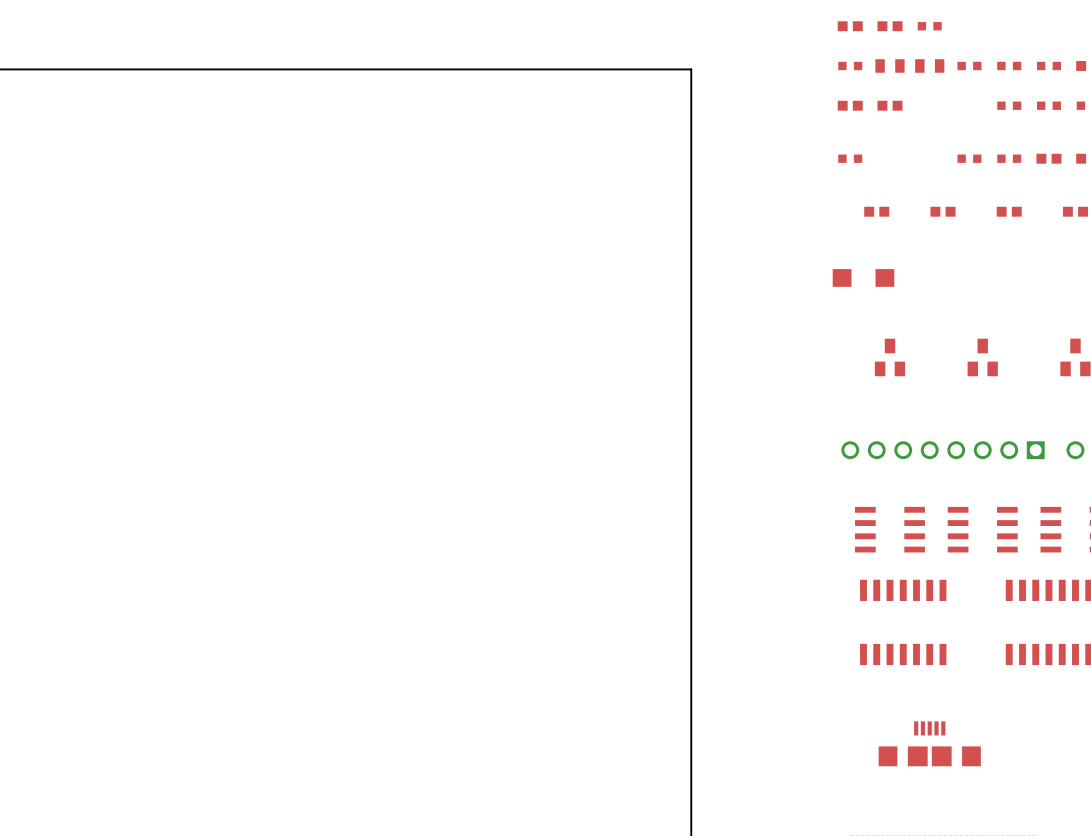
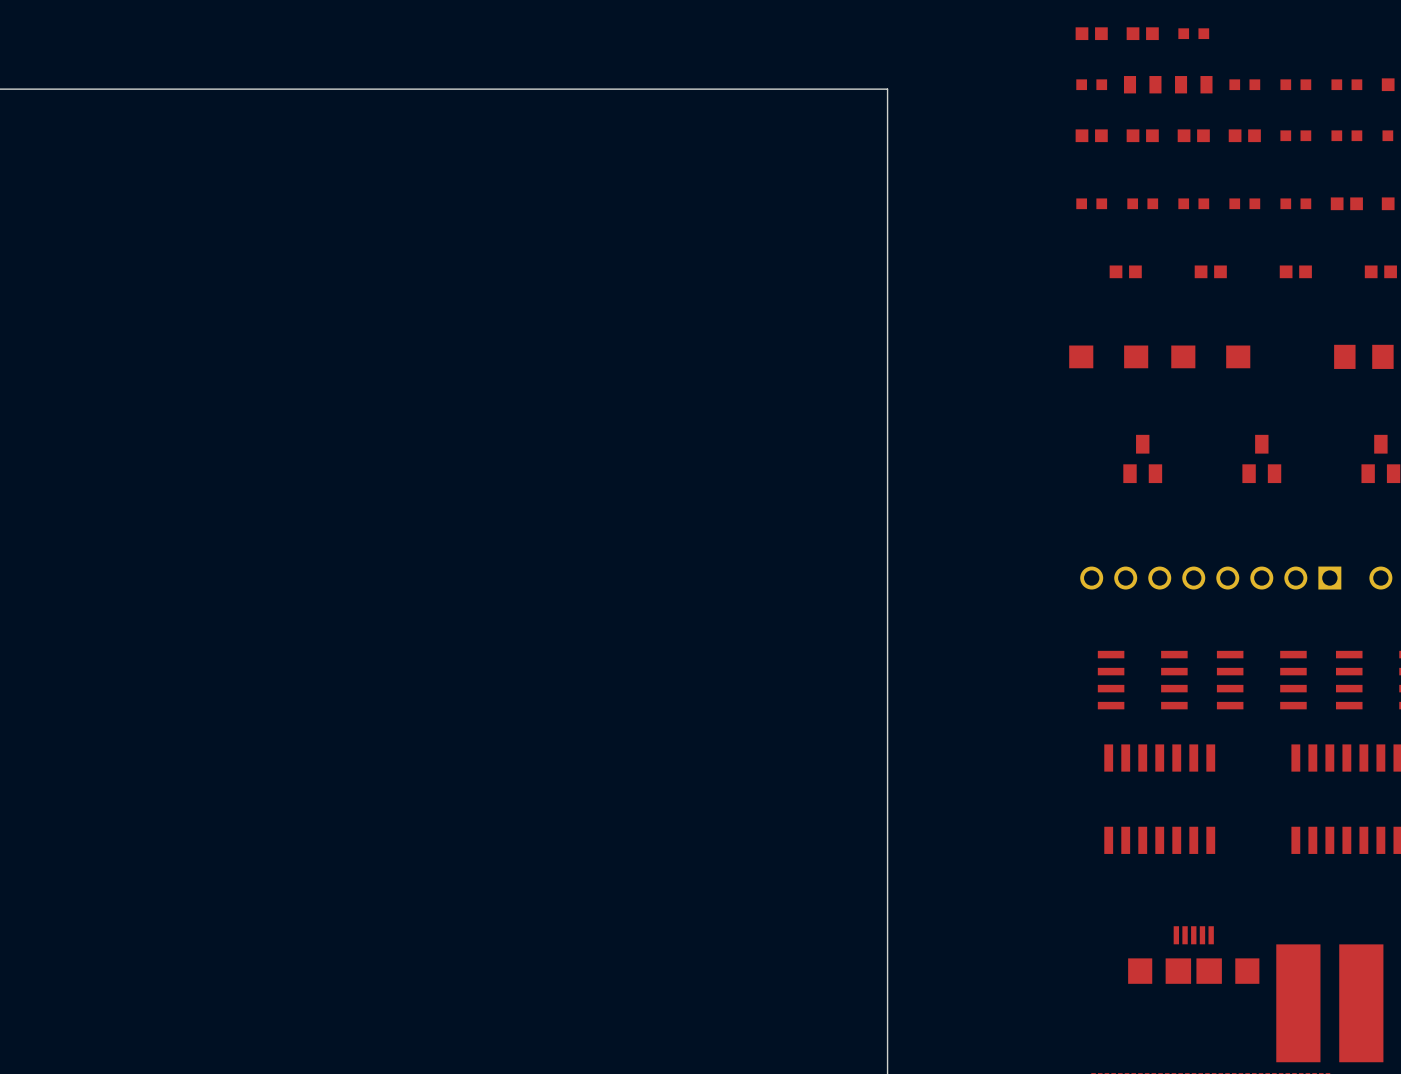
part: none -> (1193, 135)
part: none -> (1244, 135)
part: none -> (1142, 203)
part: none -> (1193, 203)
part: none -> (1210, 356)
part: none -> (1363, 356)
part: none -> (1329, 1003)

